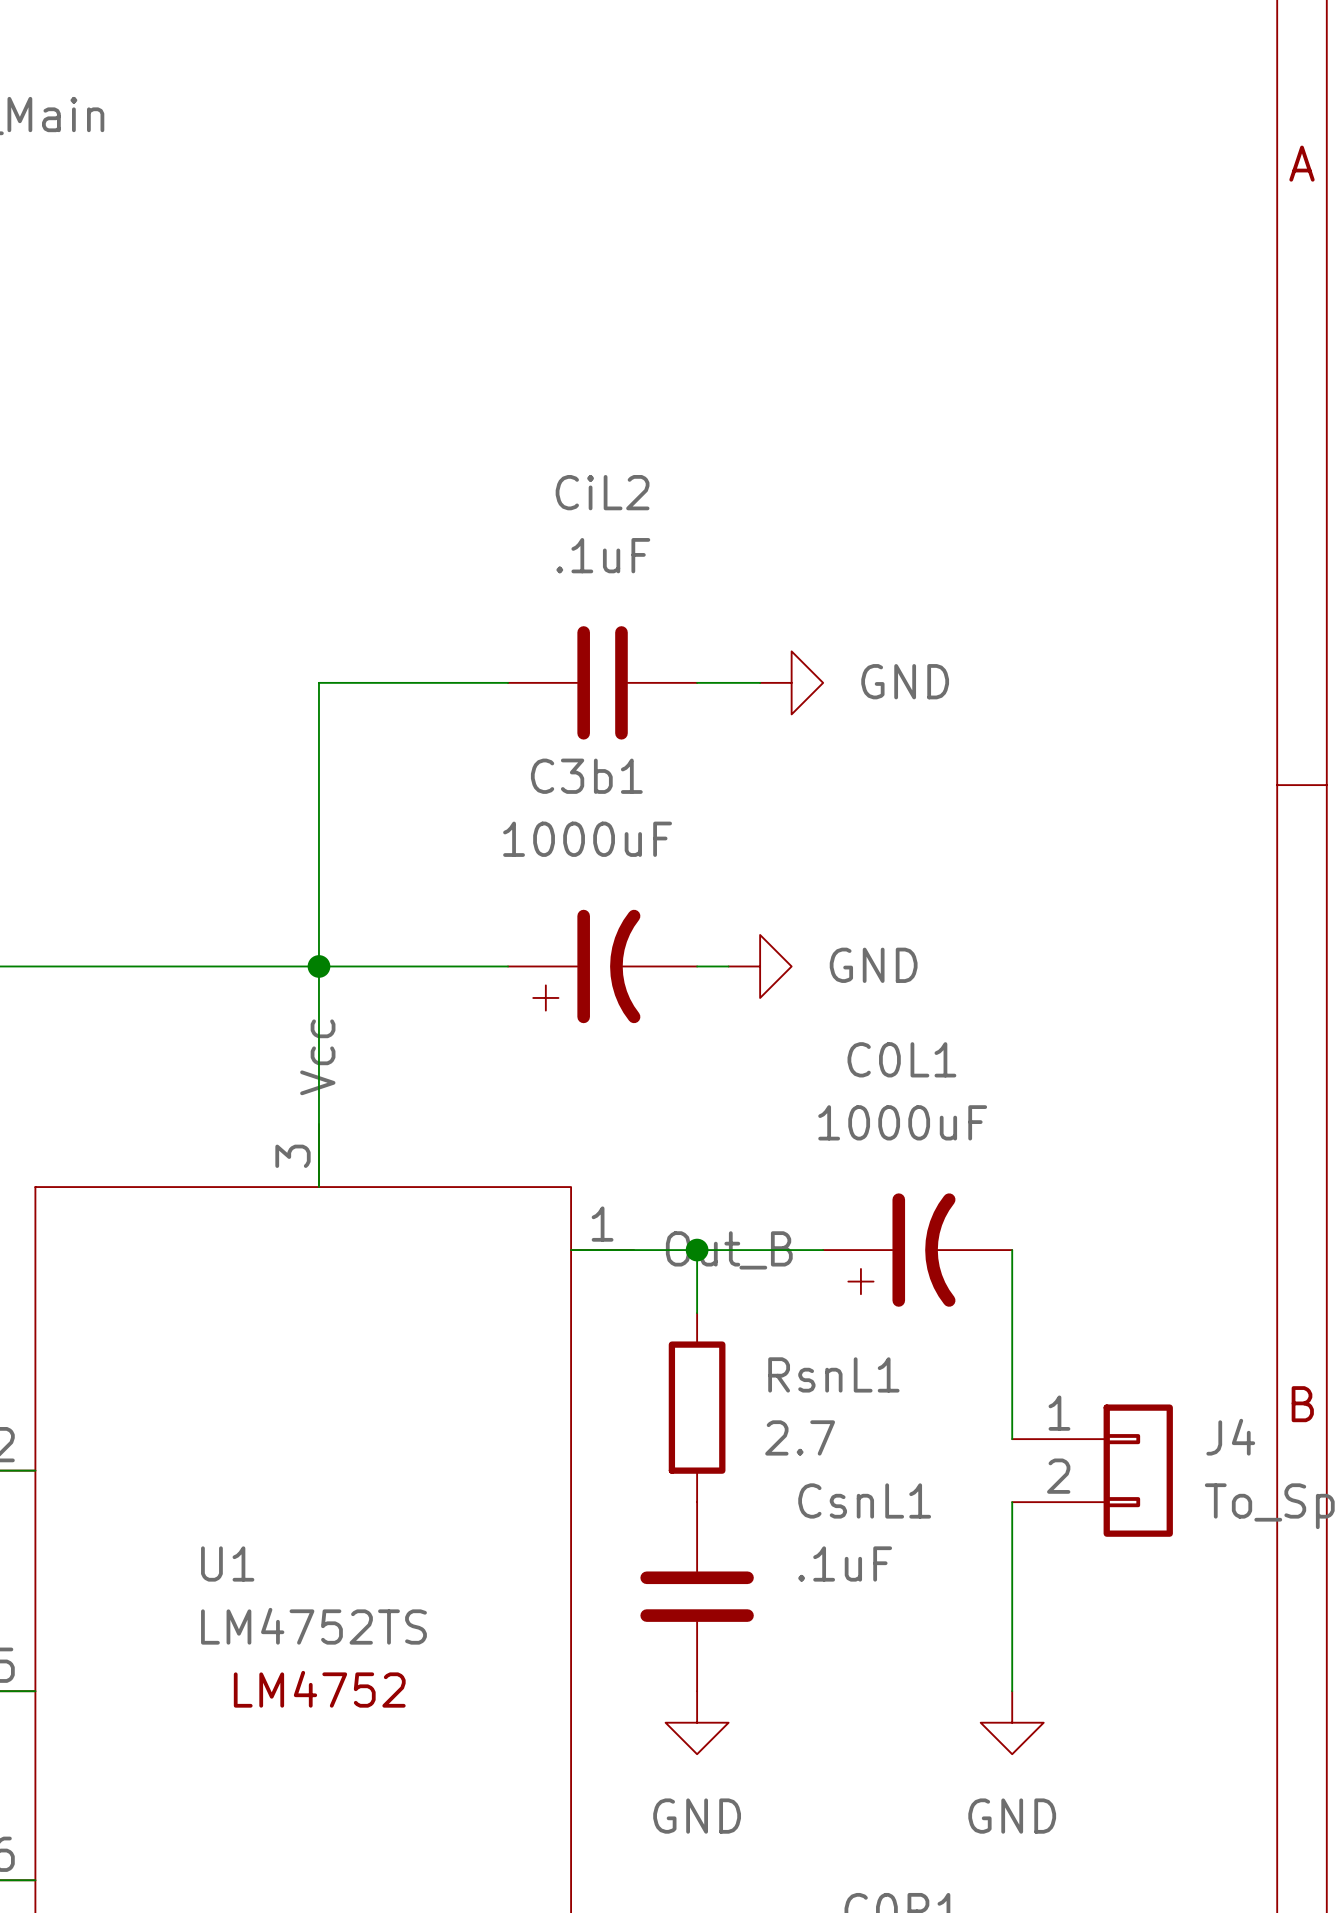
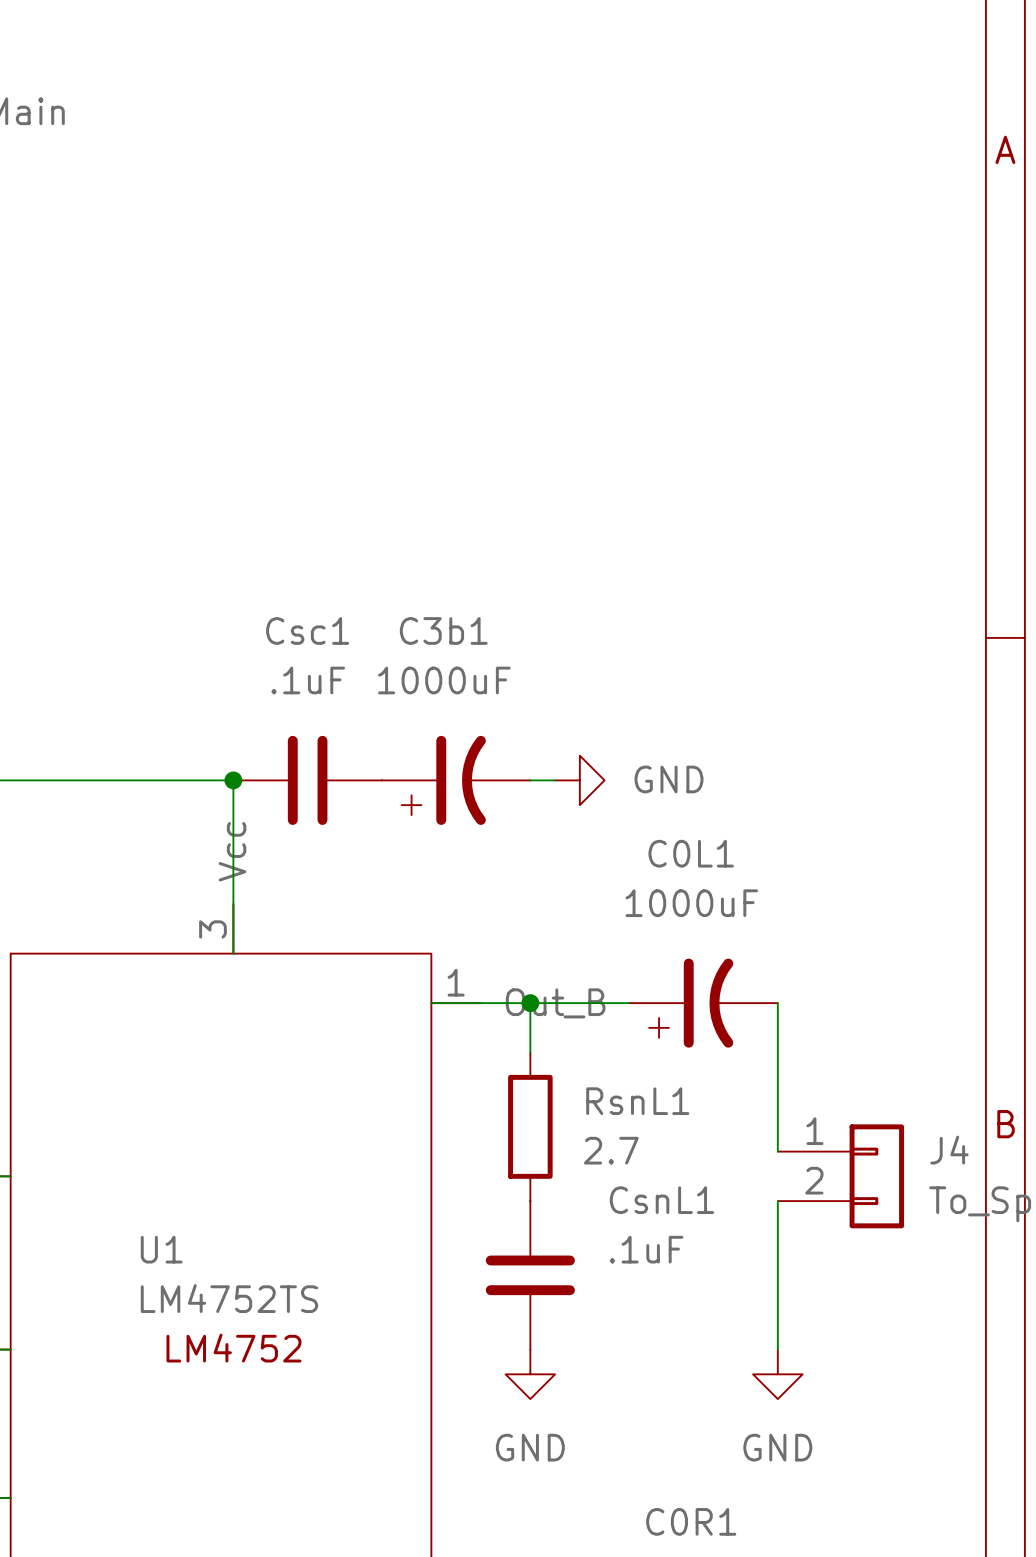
wire: (508, 682) (318, 682) (318, 966) (508, 966) -> none
CiL2: .1uF (602, 682) -> none
wire: (697, 682) (760, 682) -> none
power symbol: GND (791, 682) -> none
Csc1: none -> .1uF (307, 780)

